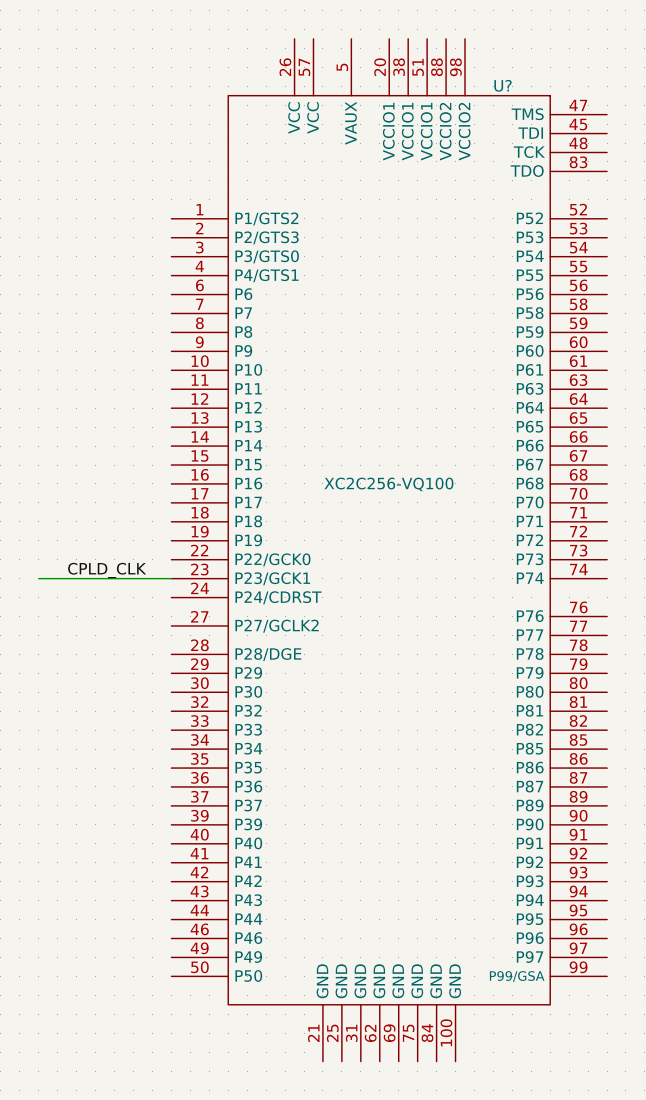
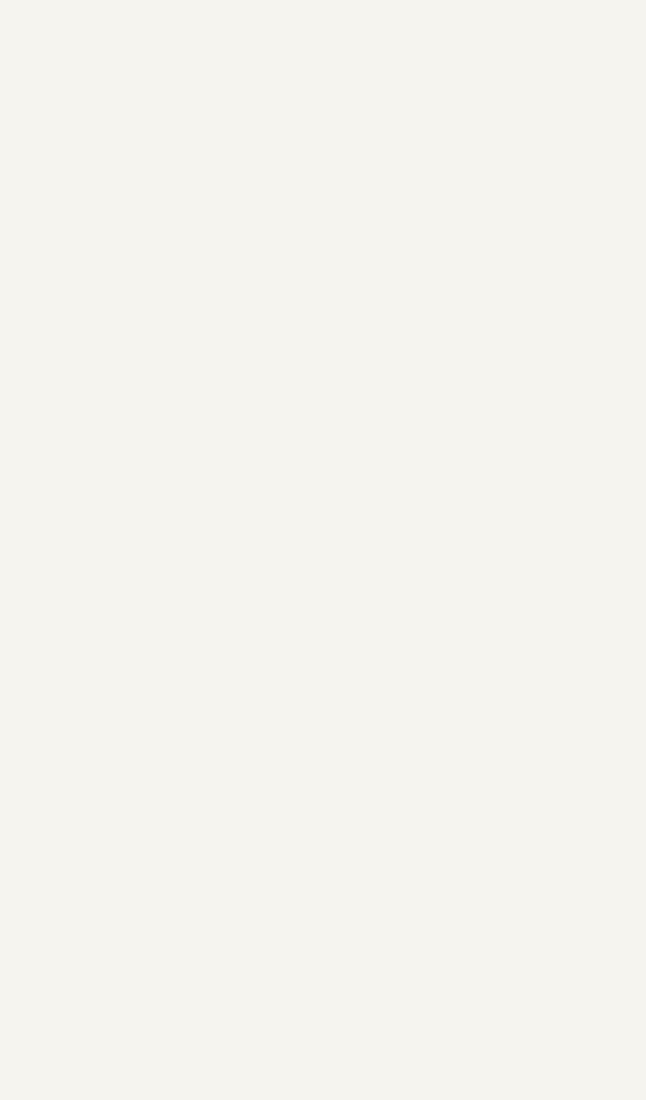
U?: XC2C256-VQ100 (389, 550) -> none
label: CPLD_CLK (107, 570) -> none
wire: (38, 578) (171, 578) -> none

